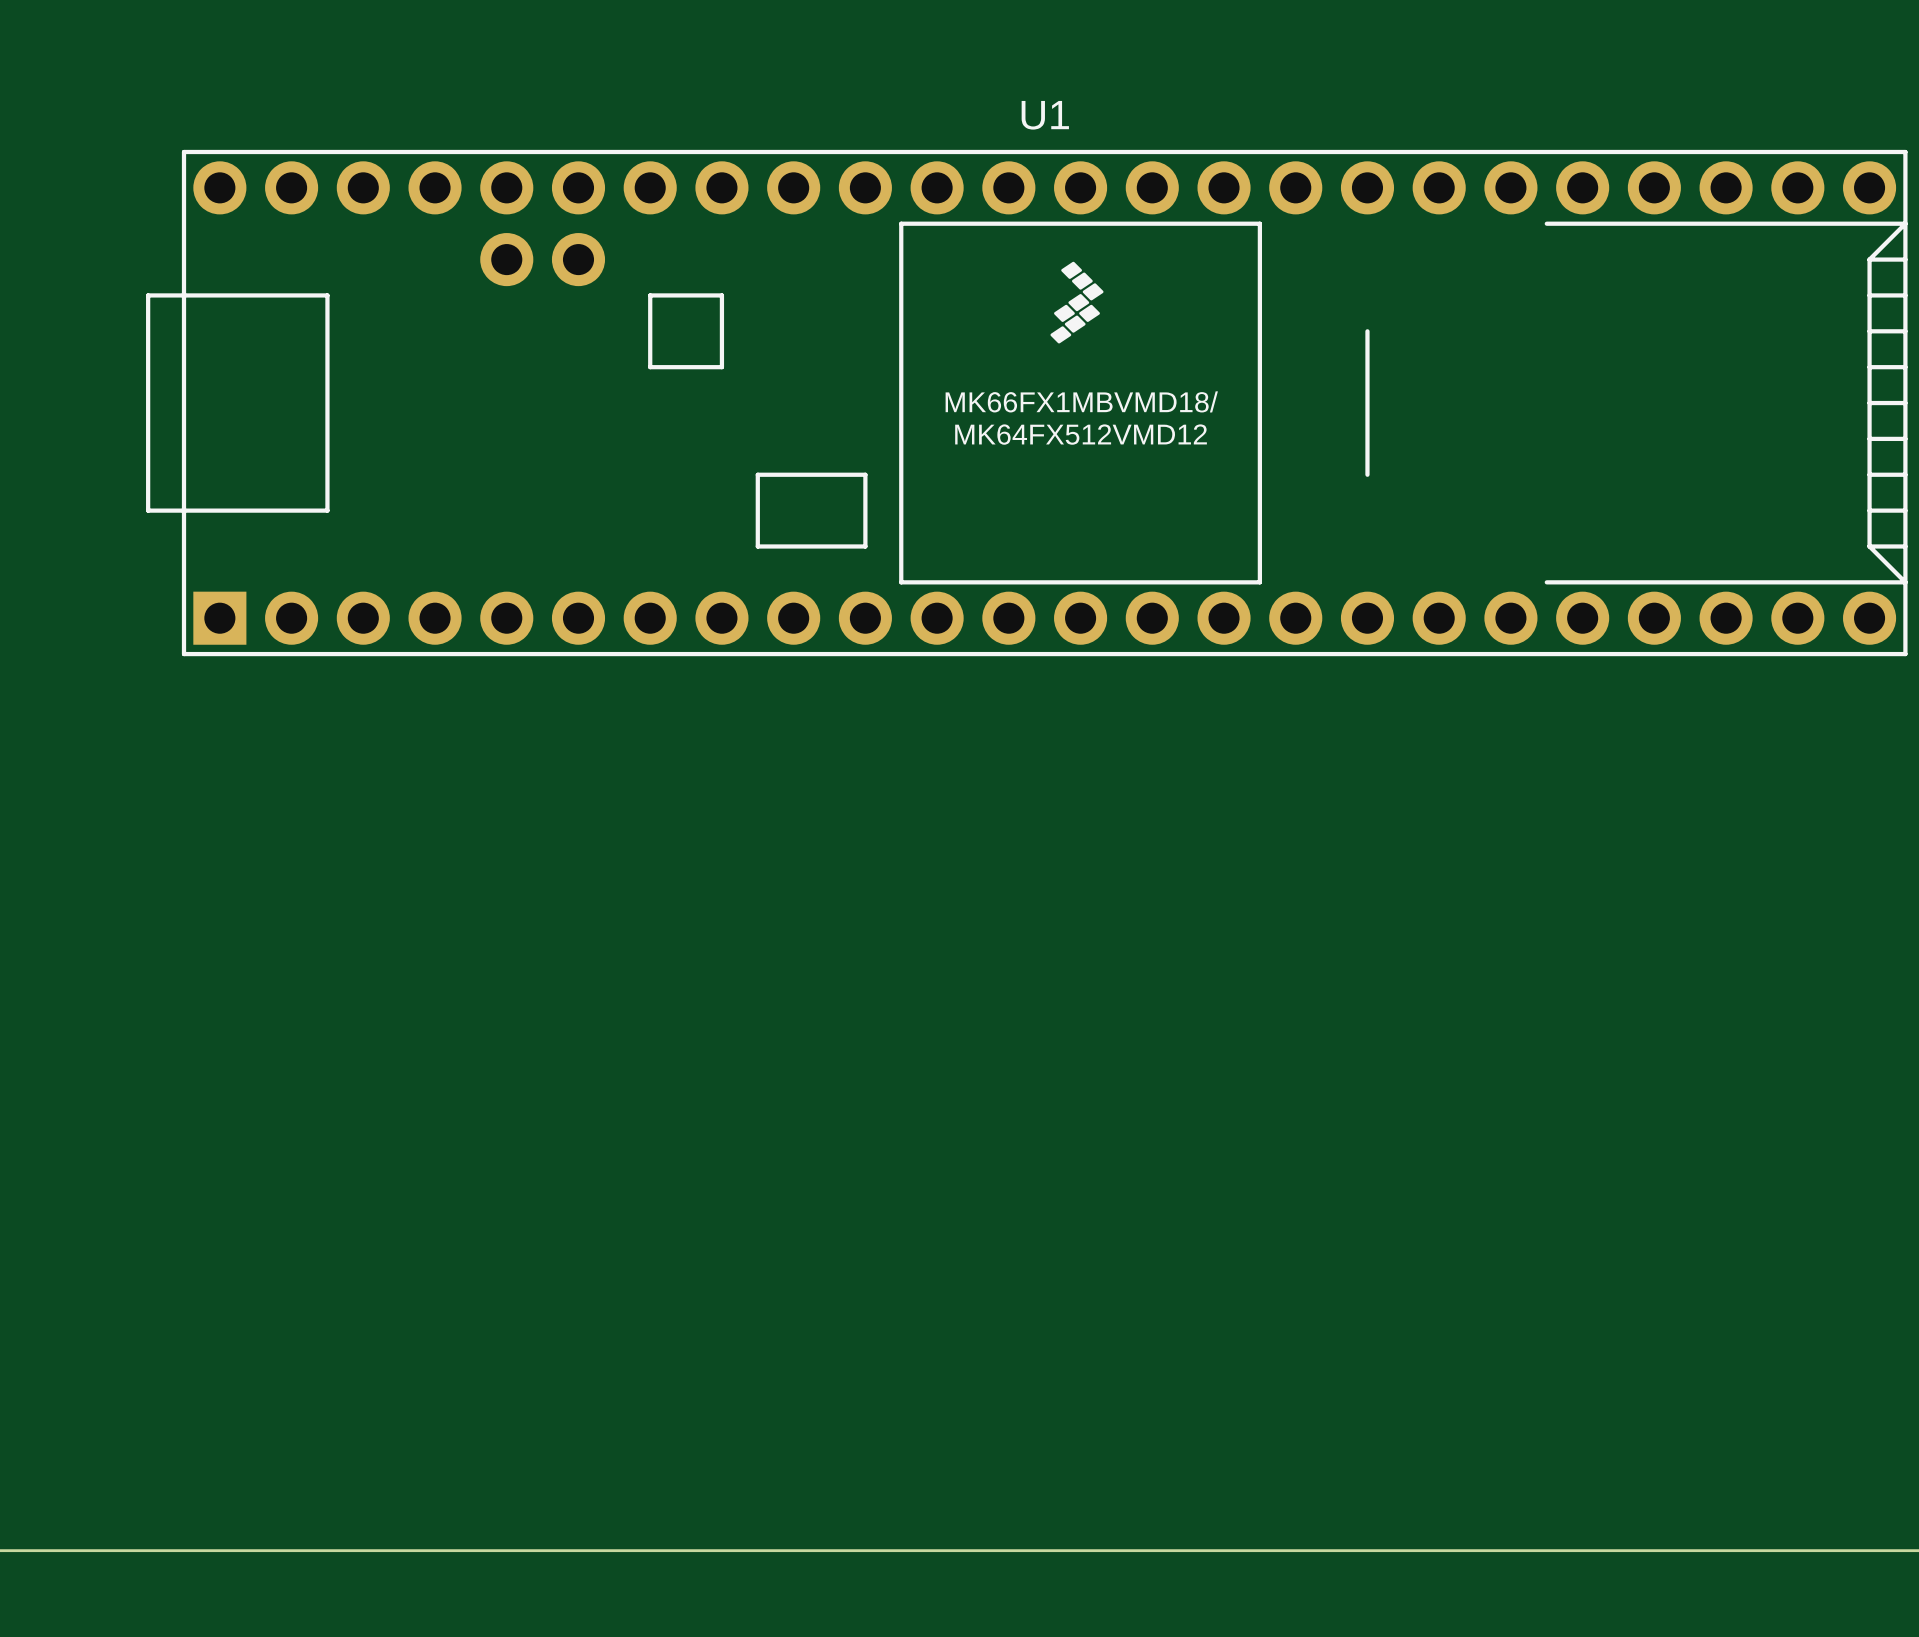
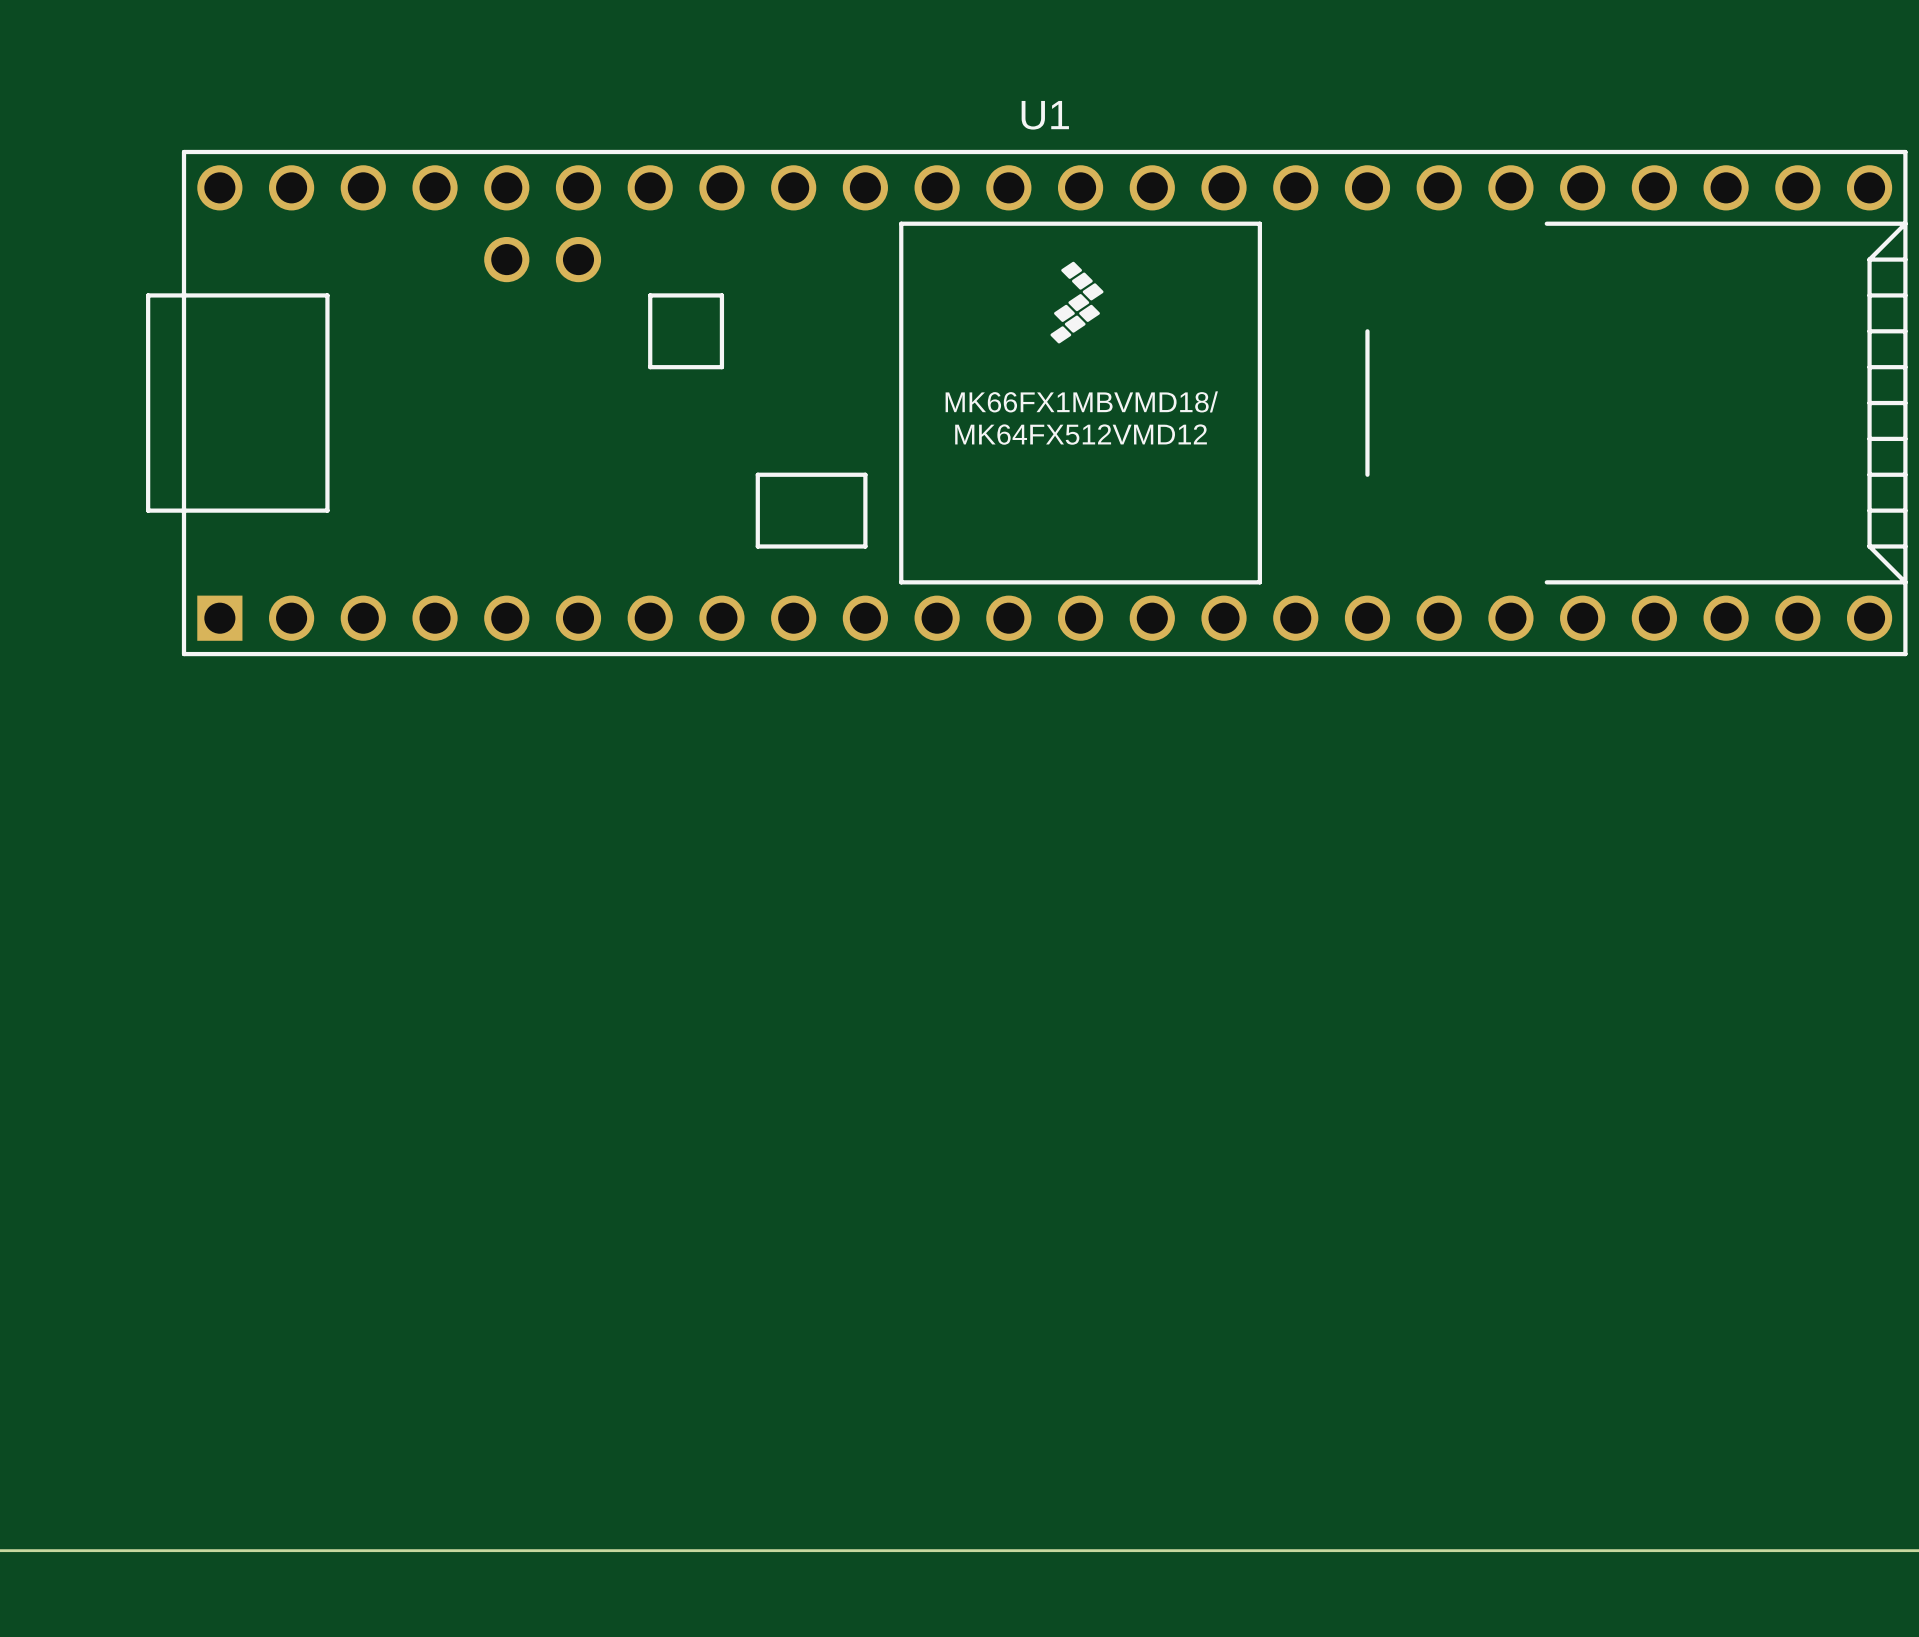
U1 footprint: [146, 149, 1908, 657] -> [146, 149, 1908, 657]

